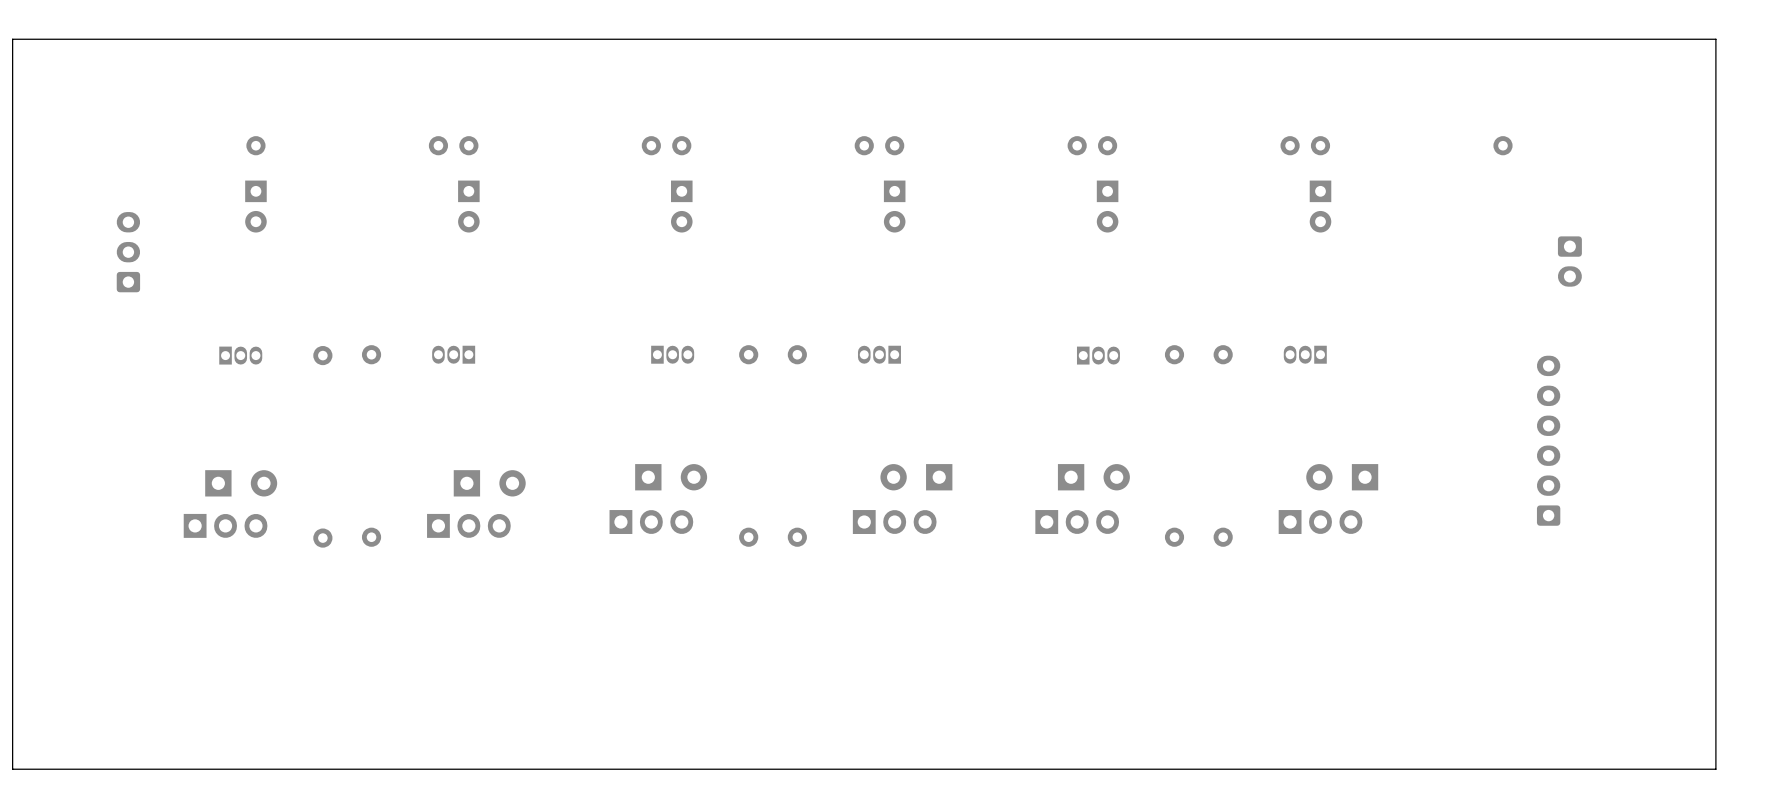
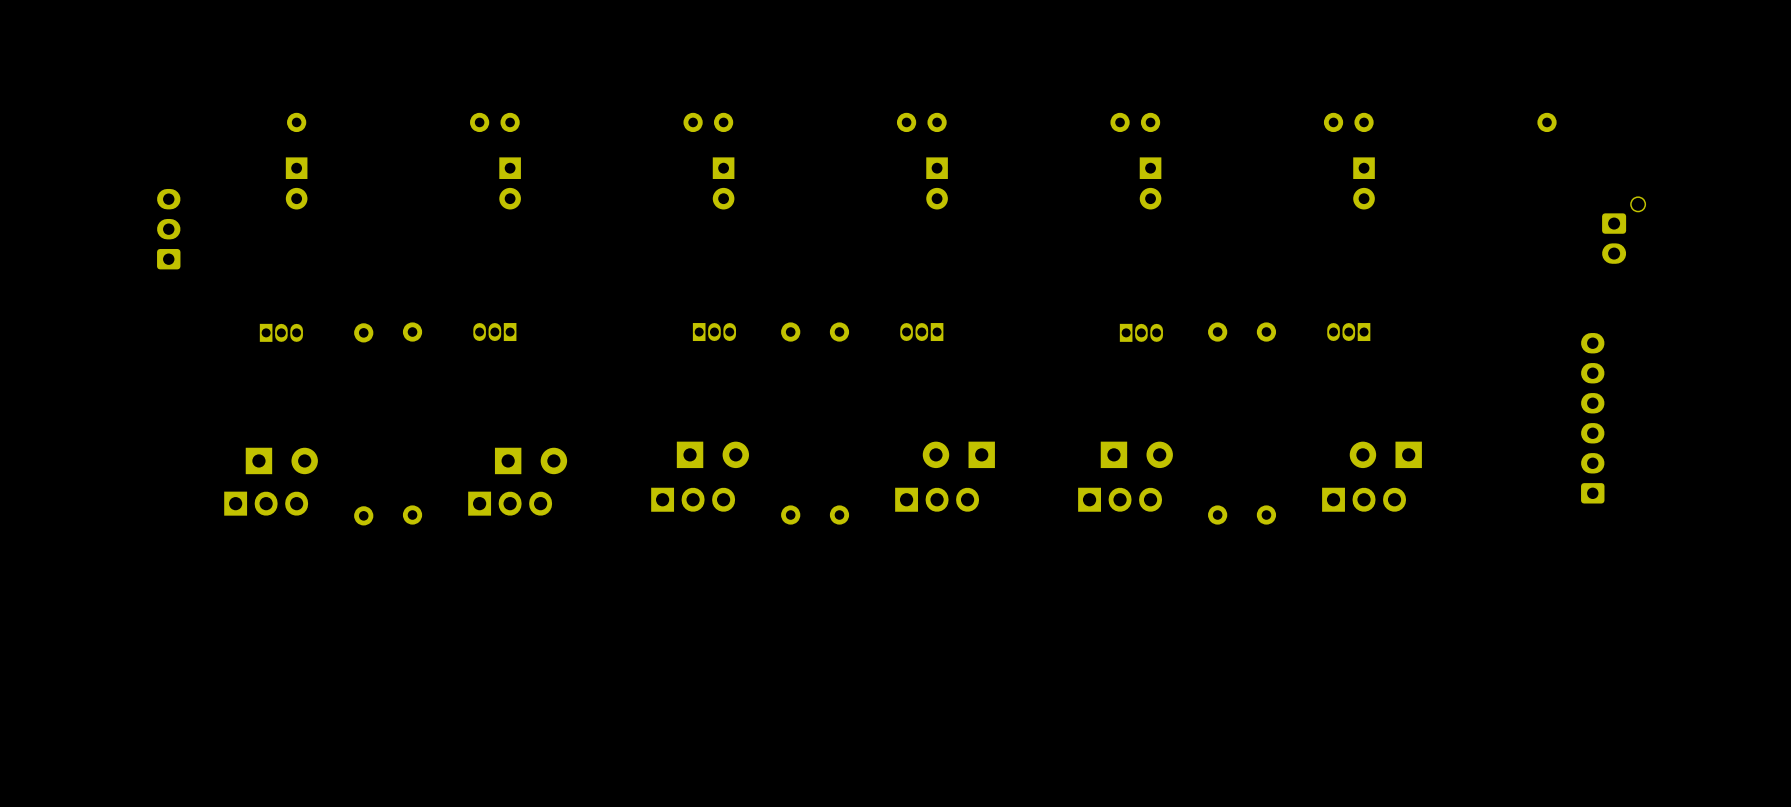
board edge: (1715, 39) (12, 39) (12, 769) (1715, 769) (1715, 39) -> none
part: none -> (1623, 230)

